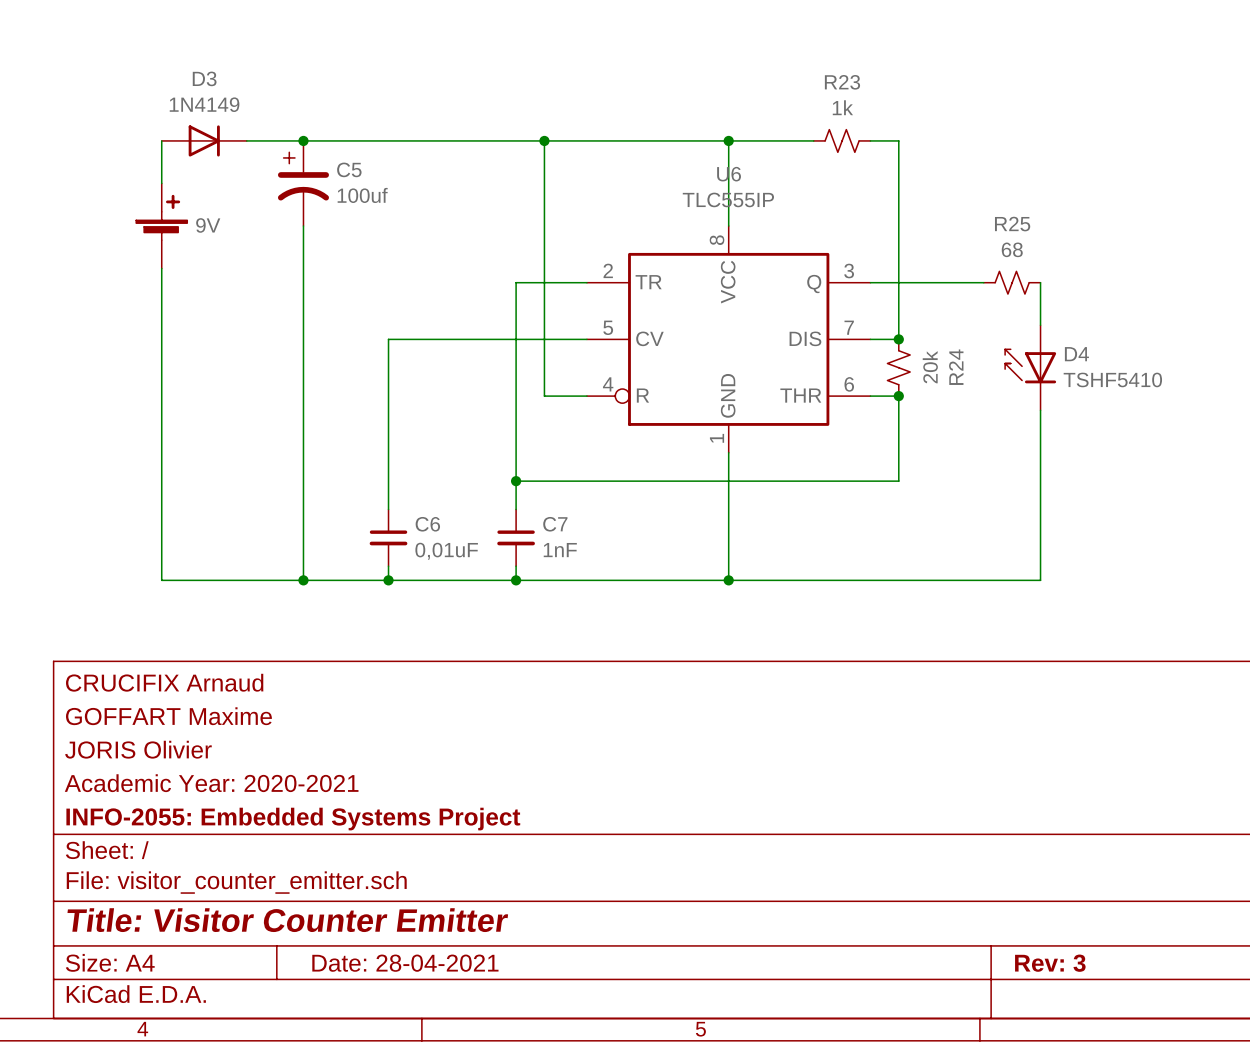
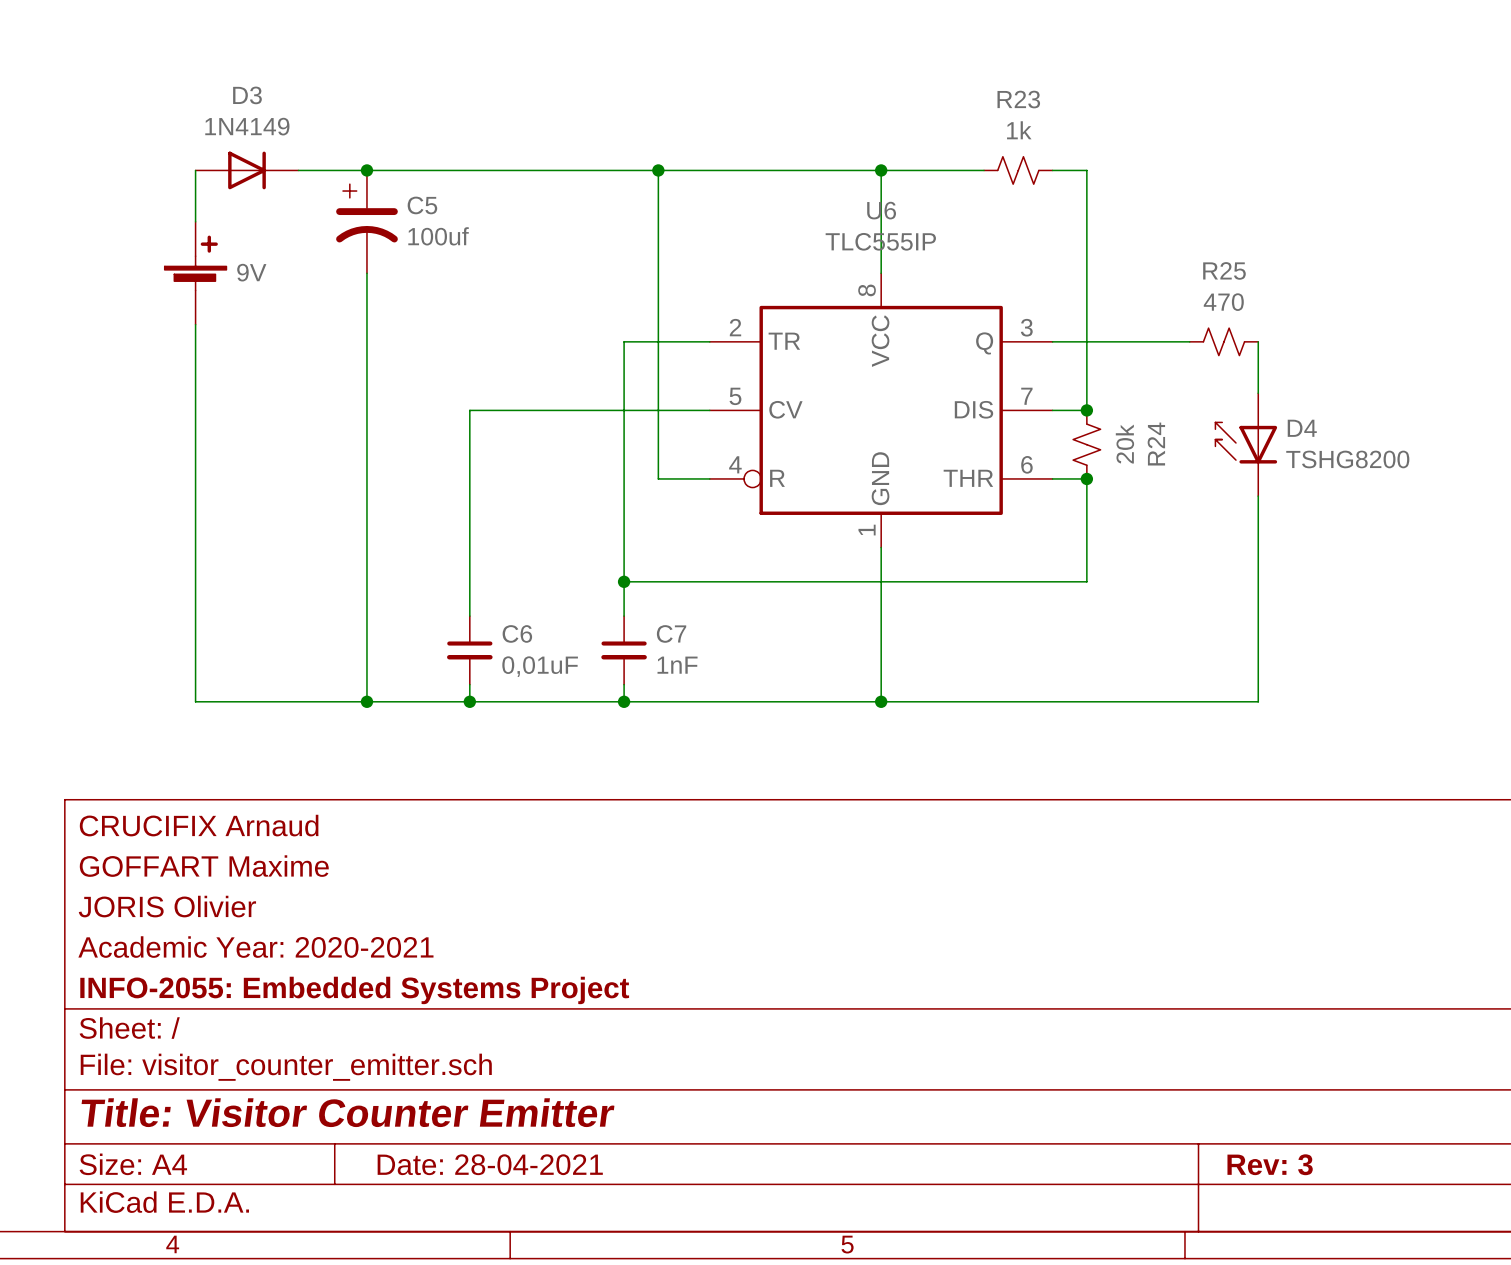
R25 value: 68 (1012, 249) -> 470 (1223, 302)
D4 value: TSHF5410 (1112, 379) -> TSHG8200 (1347, 459)

